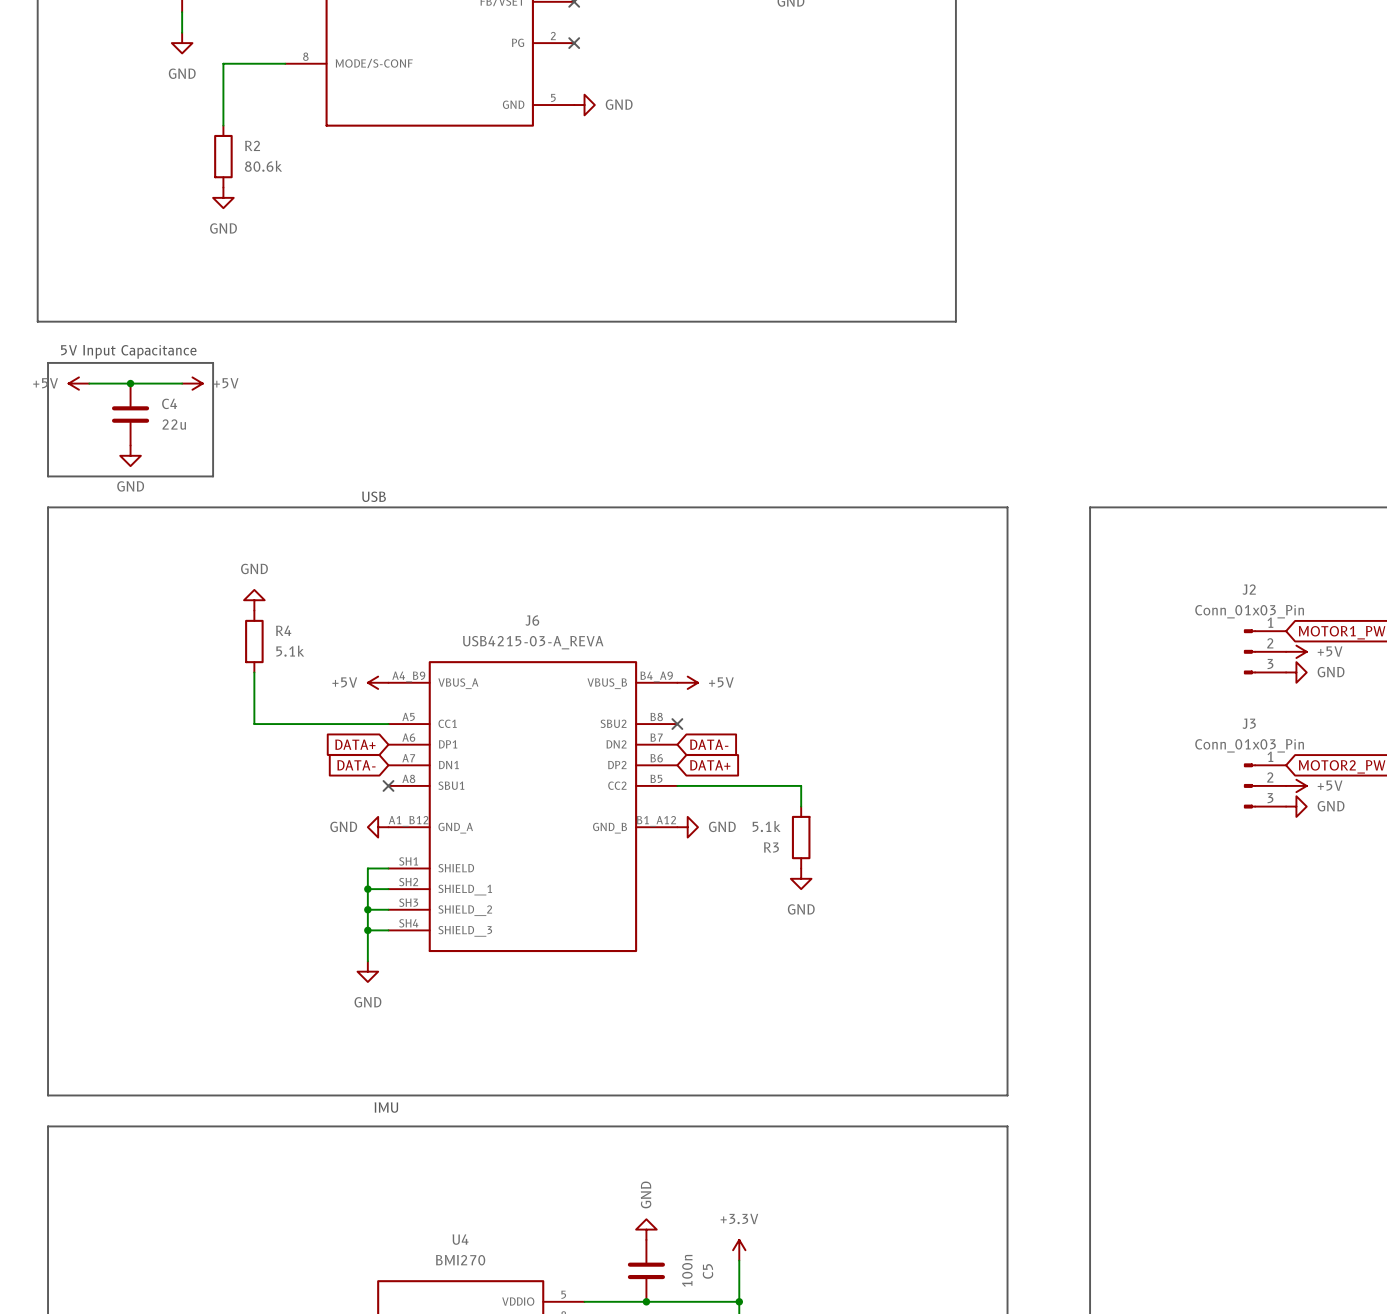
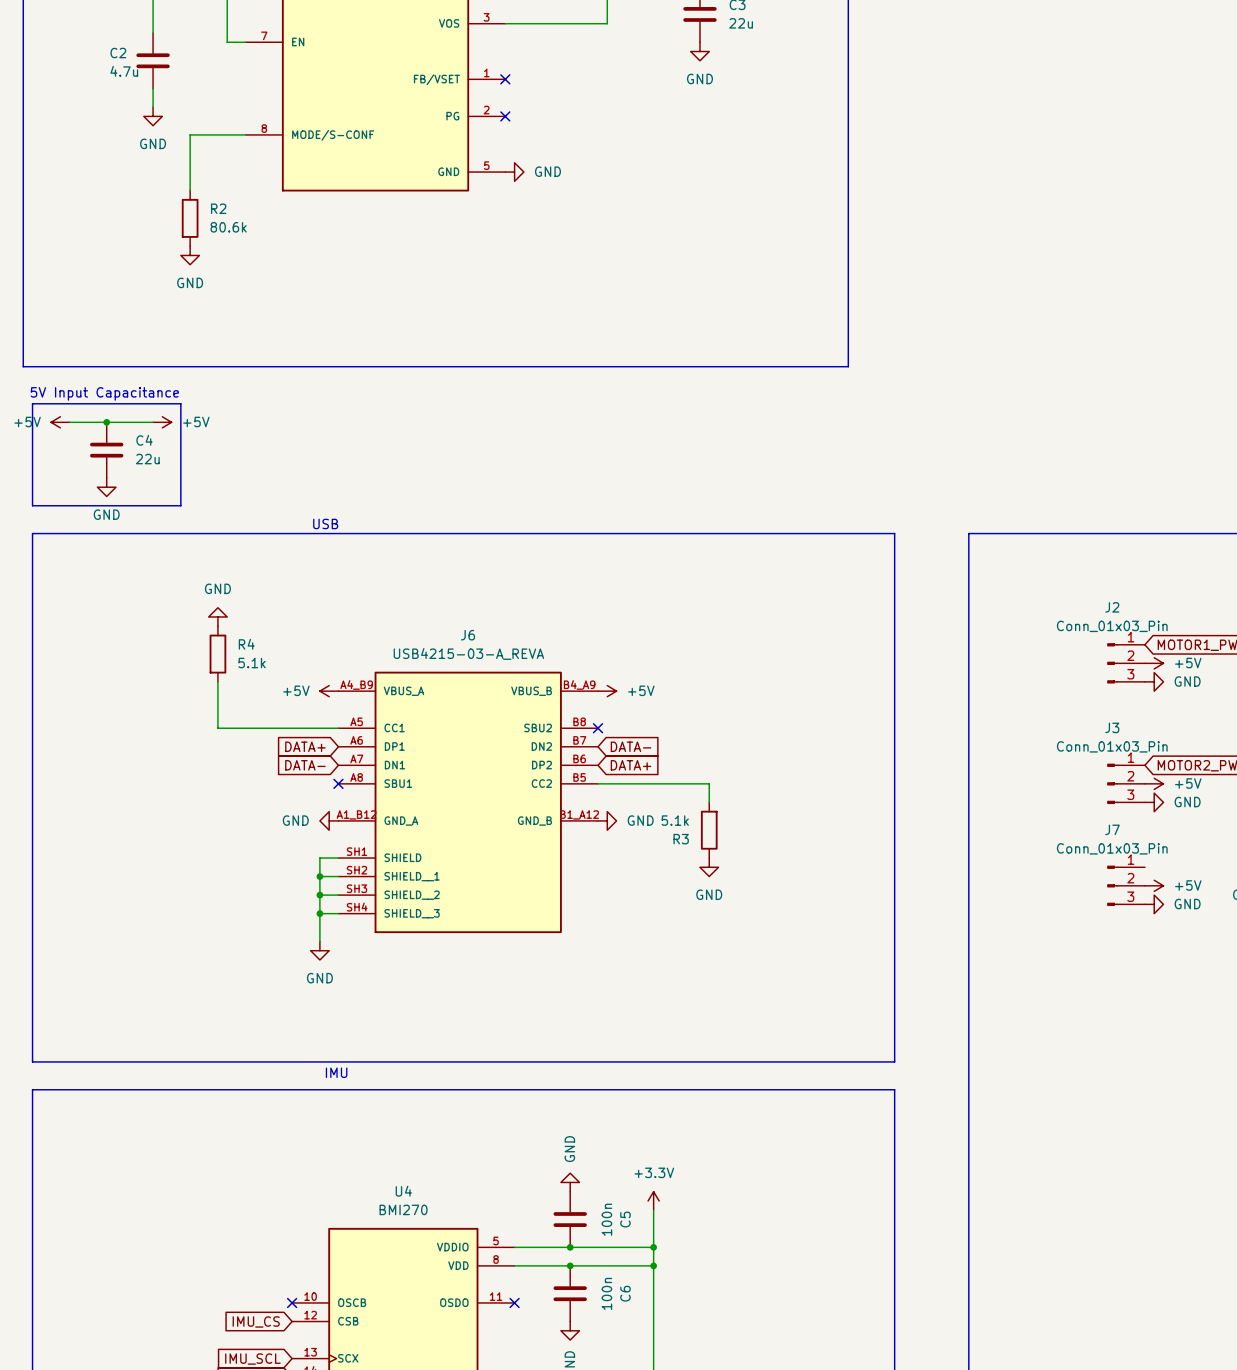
J7: none -> Conn_01x03_Pin (1126, 885)
power symbol: none -> +5V (1154, 885)
power symbol: none -> GND (1154, 904)

